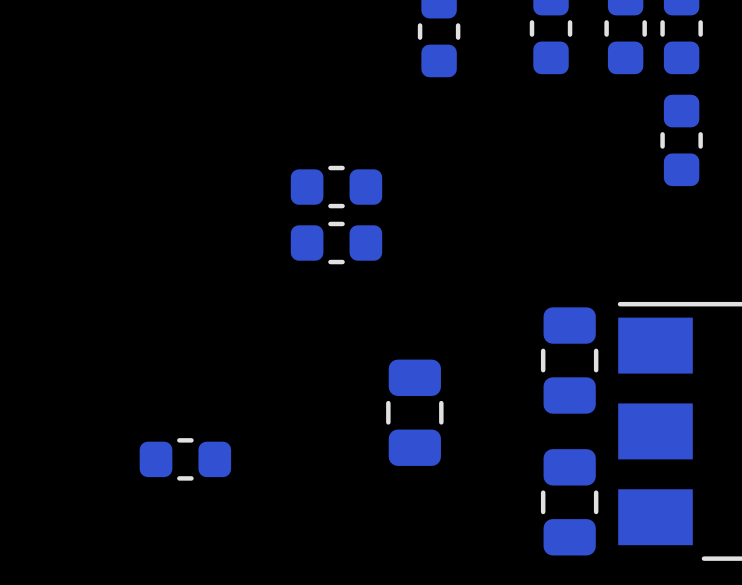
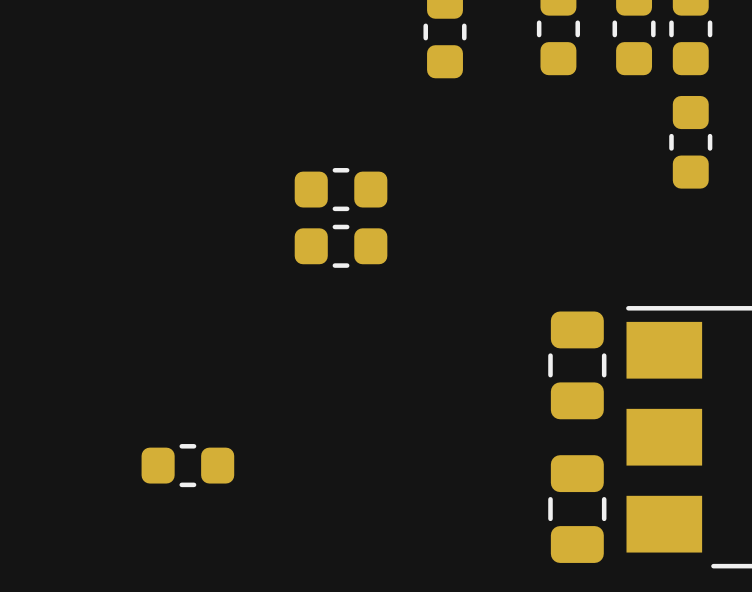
part: (414, 412) -> none

